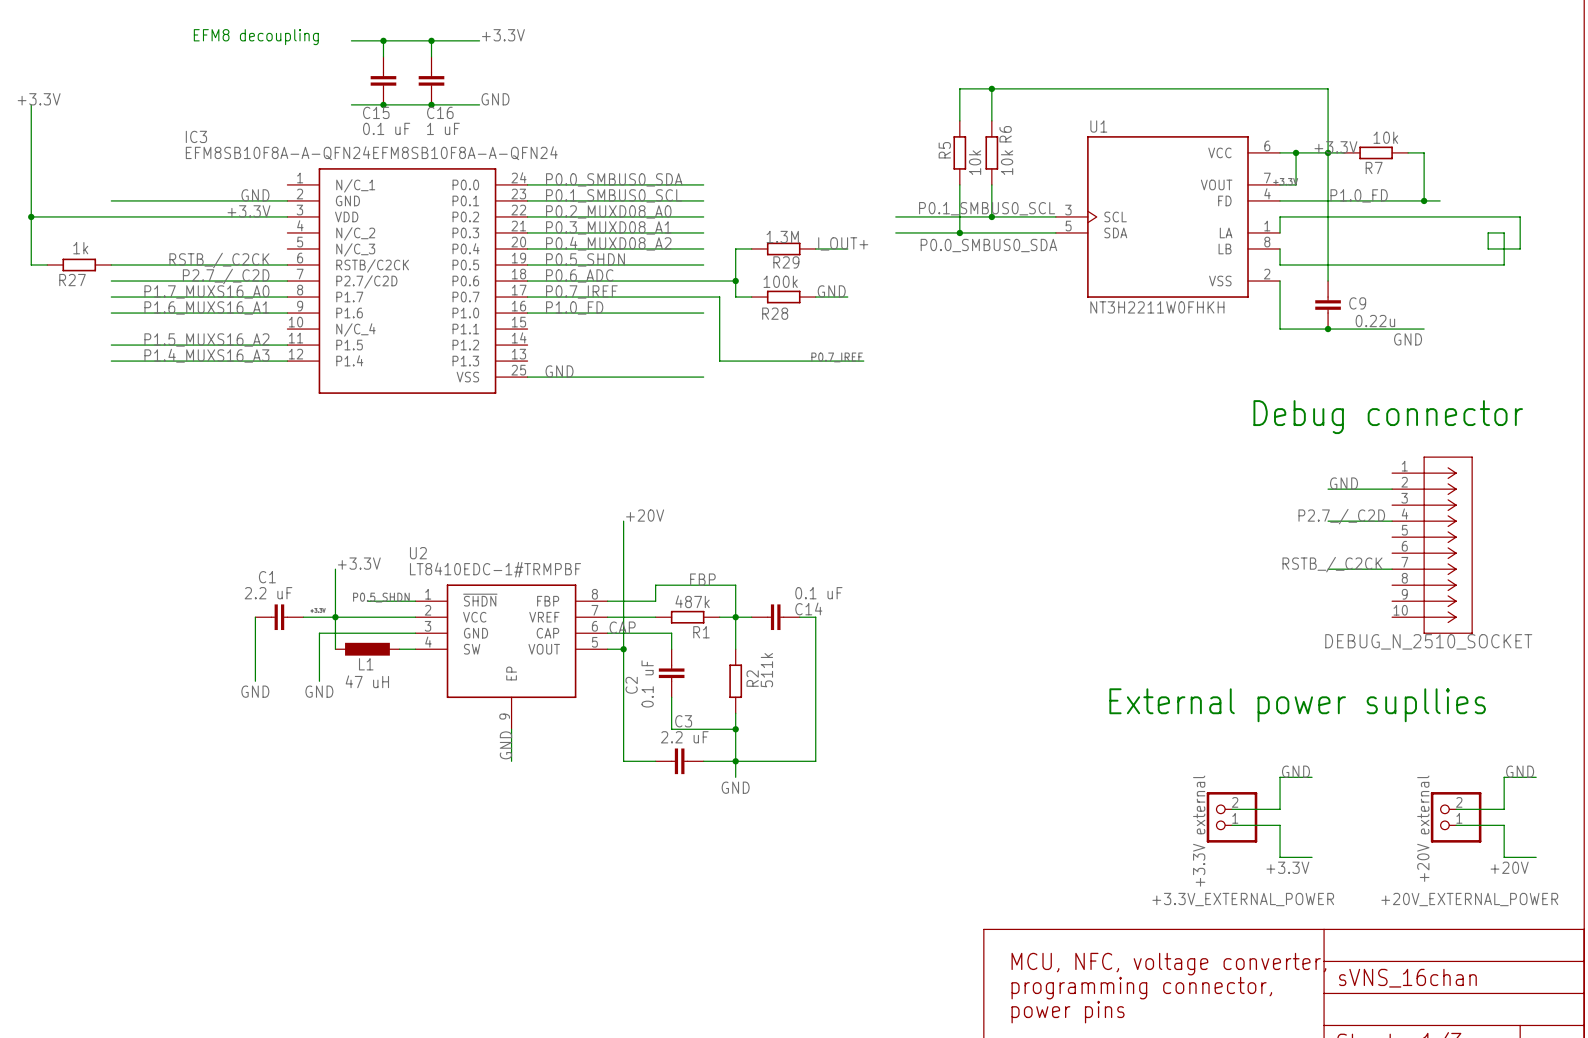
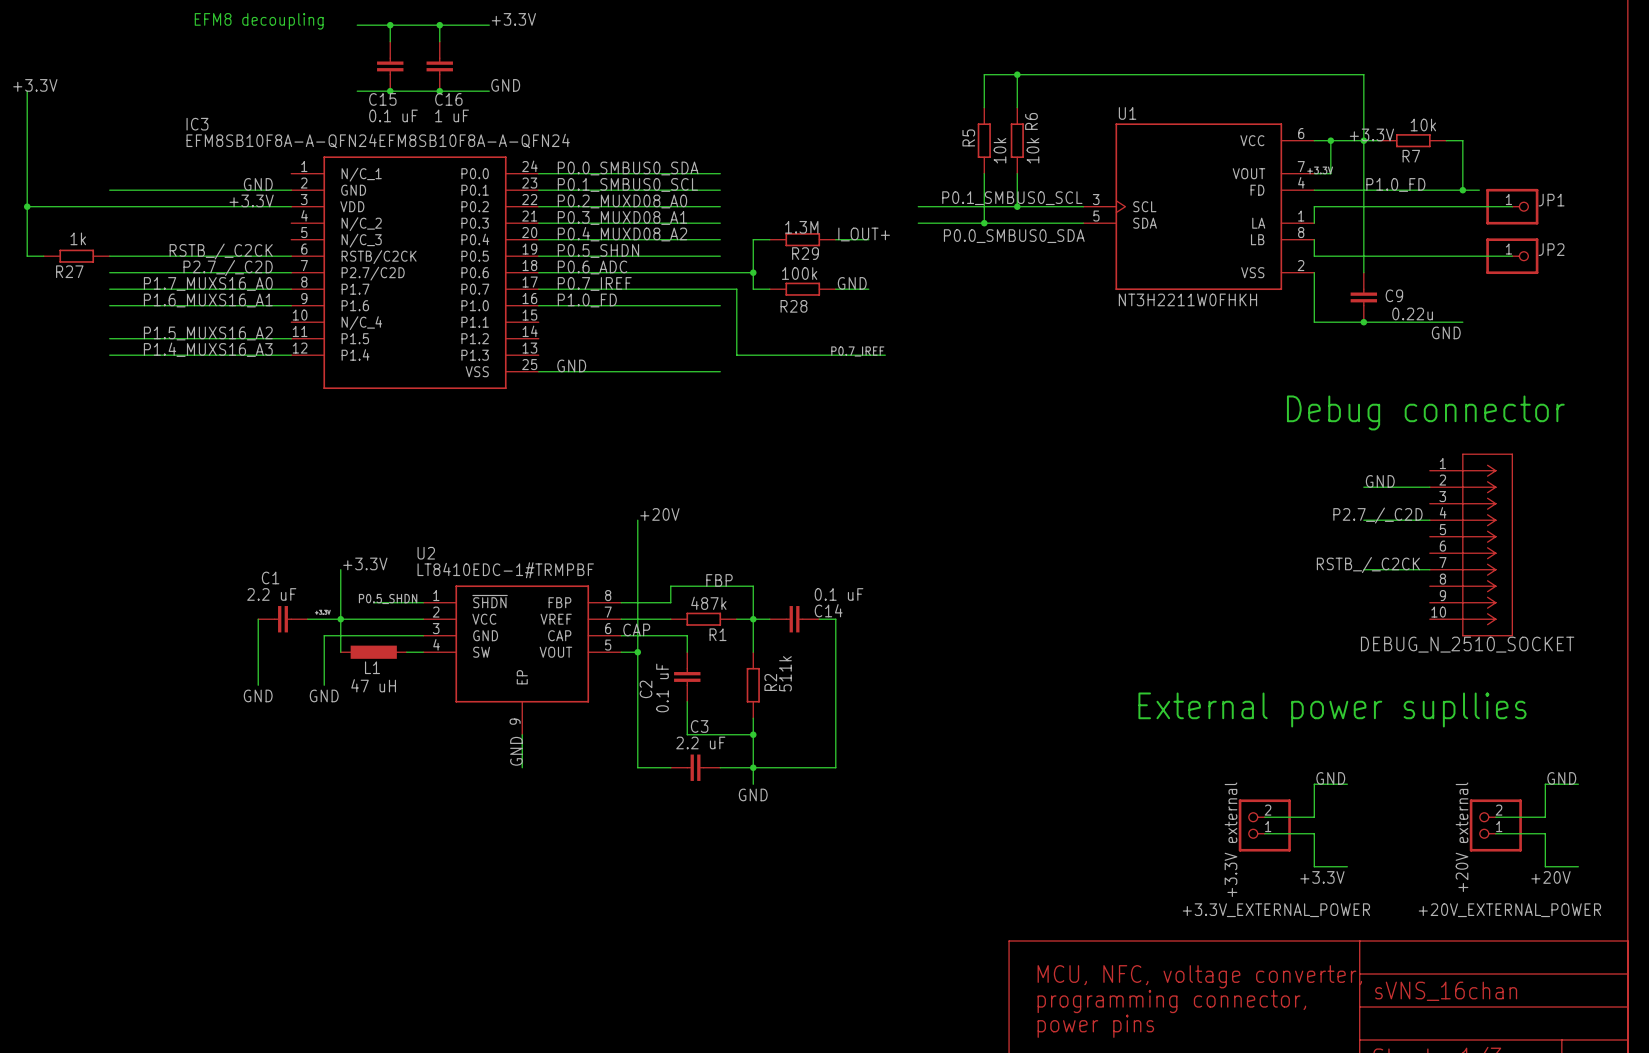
wire: (1472, 216) (1520, 216) (1520, 248) (1488, 248) (1488, 232) (1504, 232) (1504, 265) (1472, 265) -> none
JP1: none -> (1512, 206)
JP2: none -> (1512, 256)

